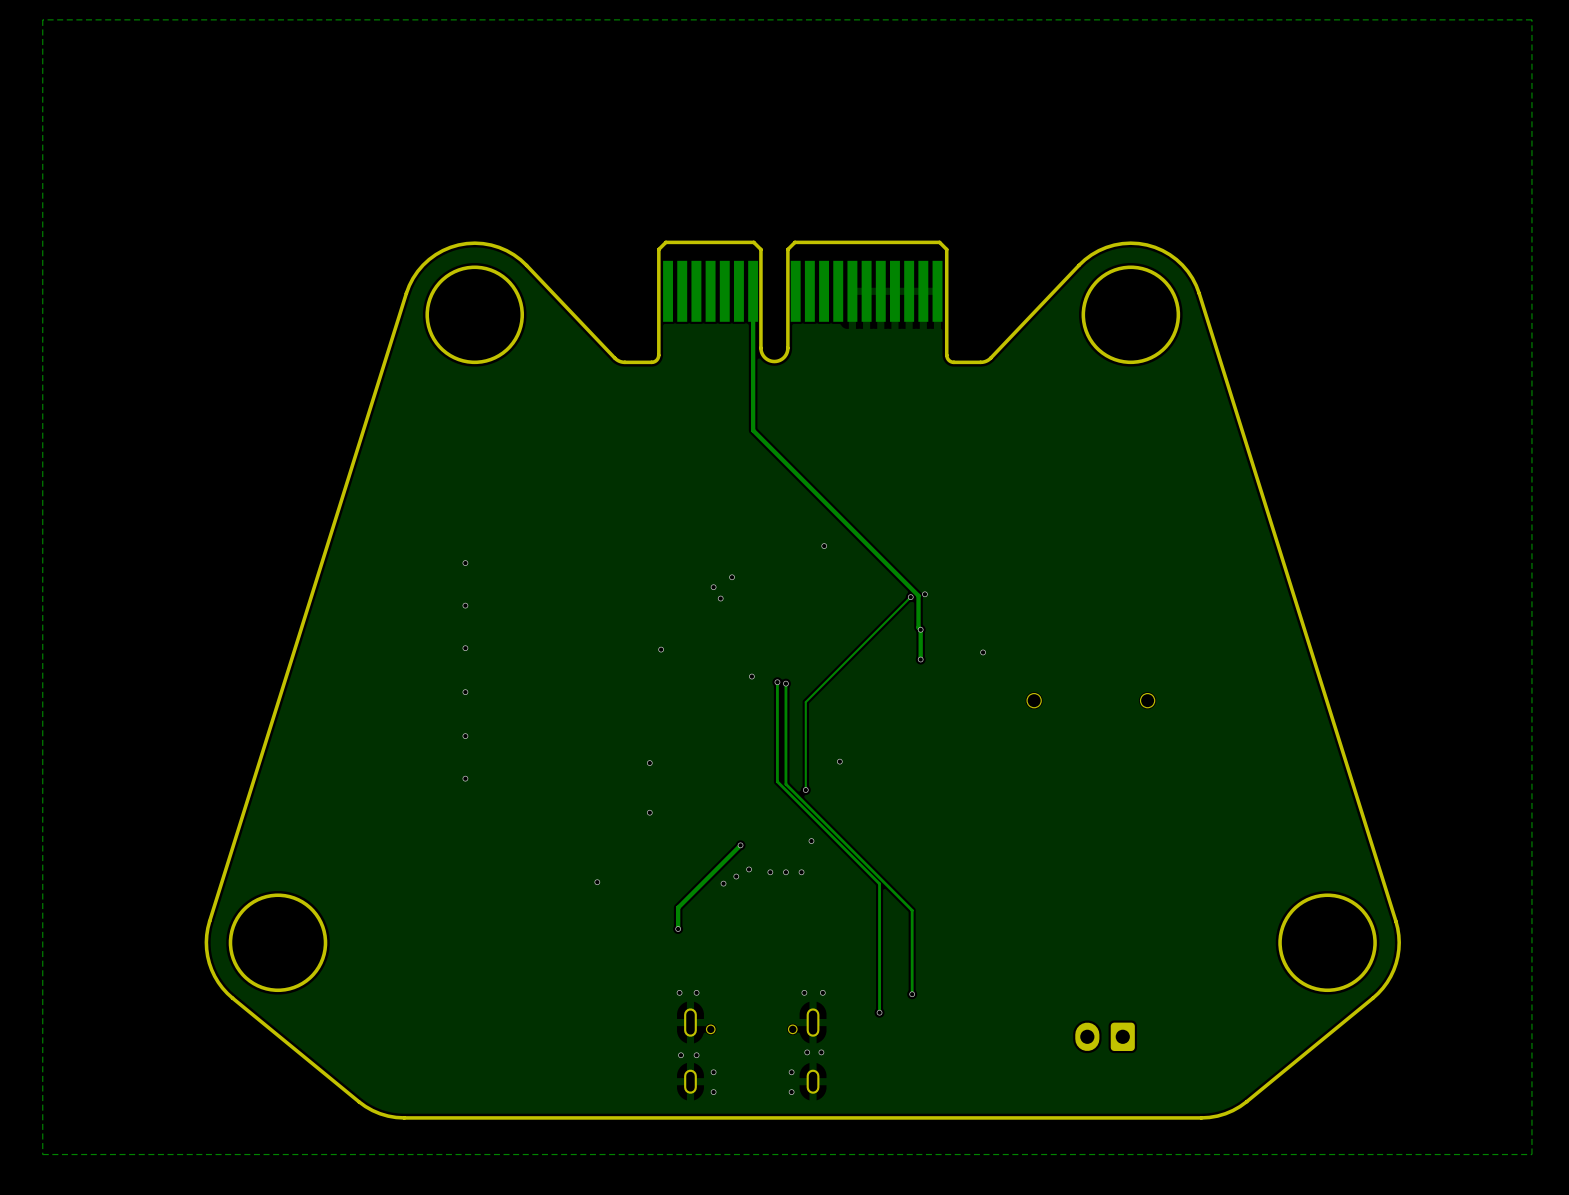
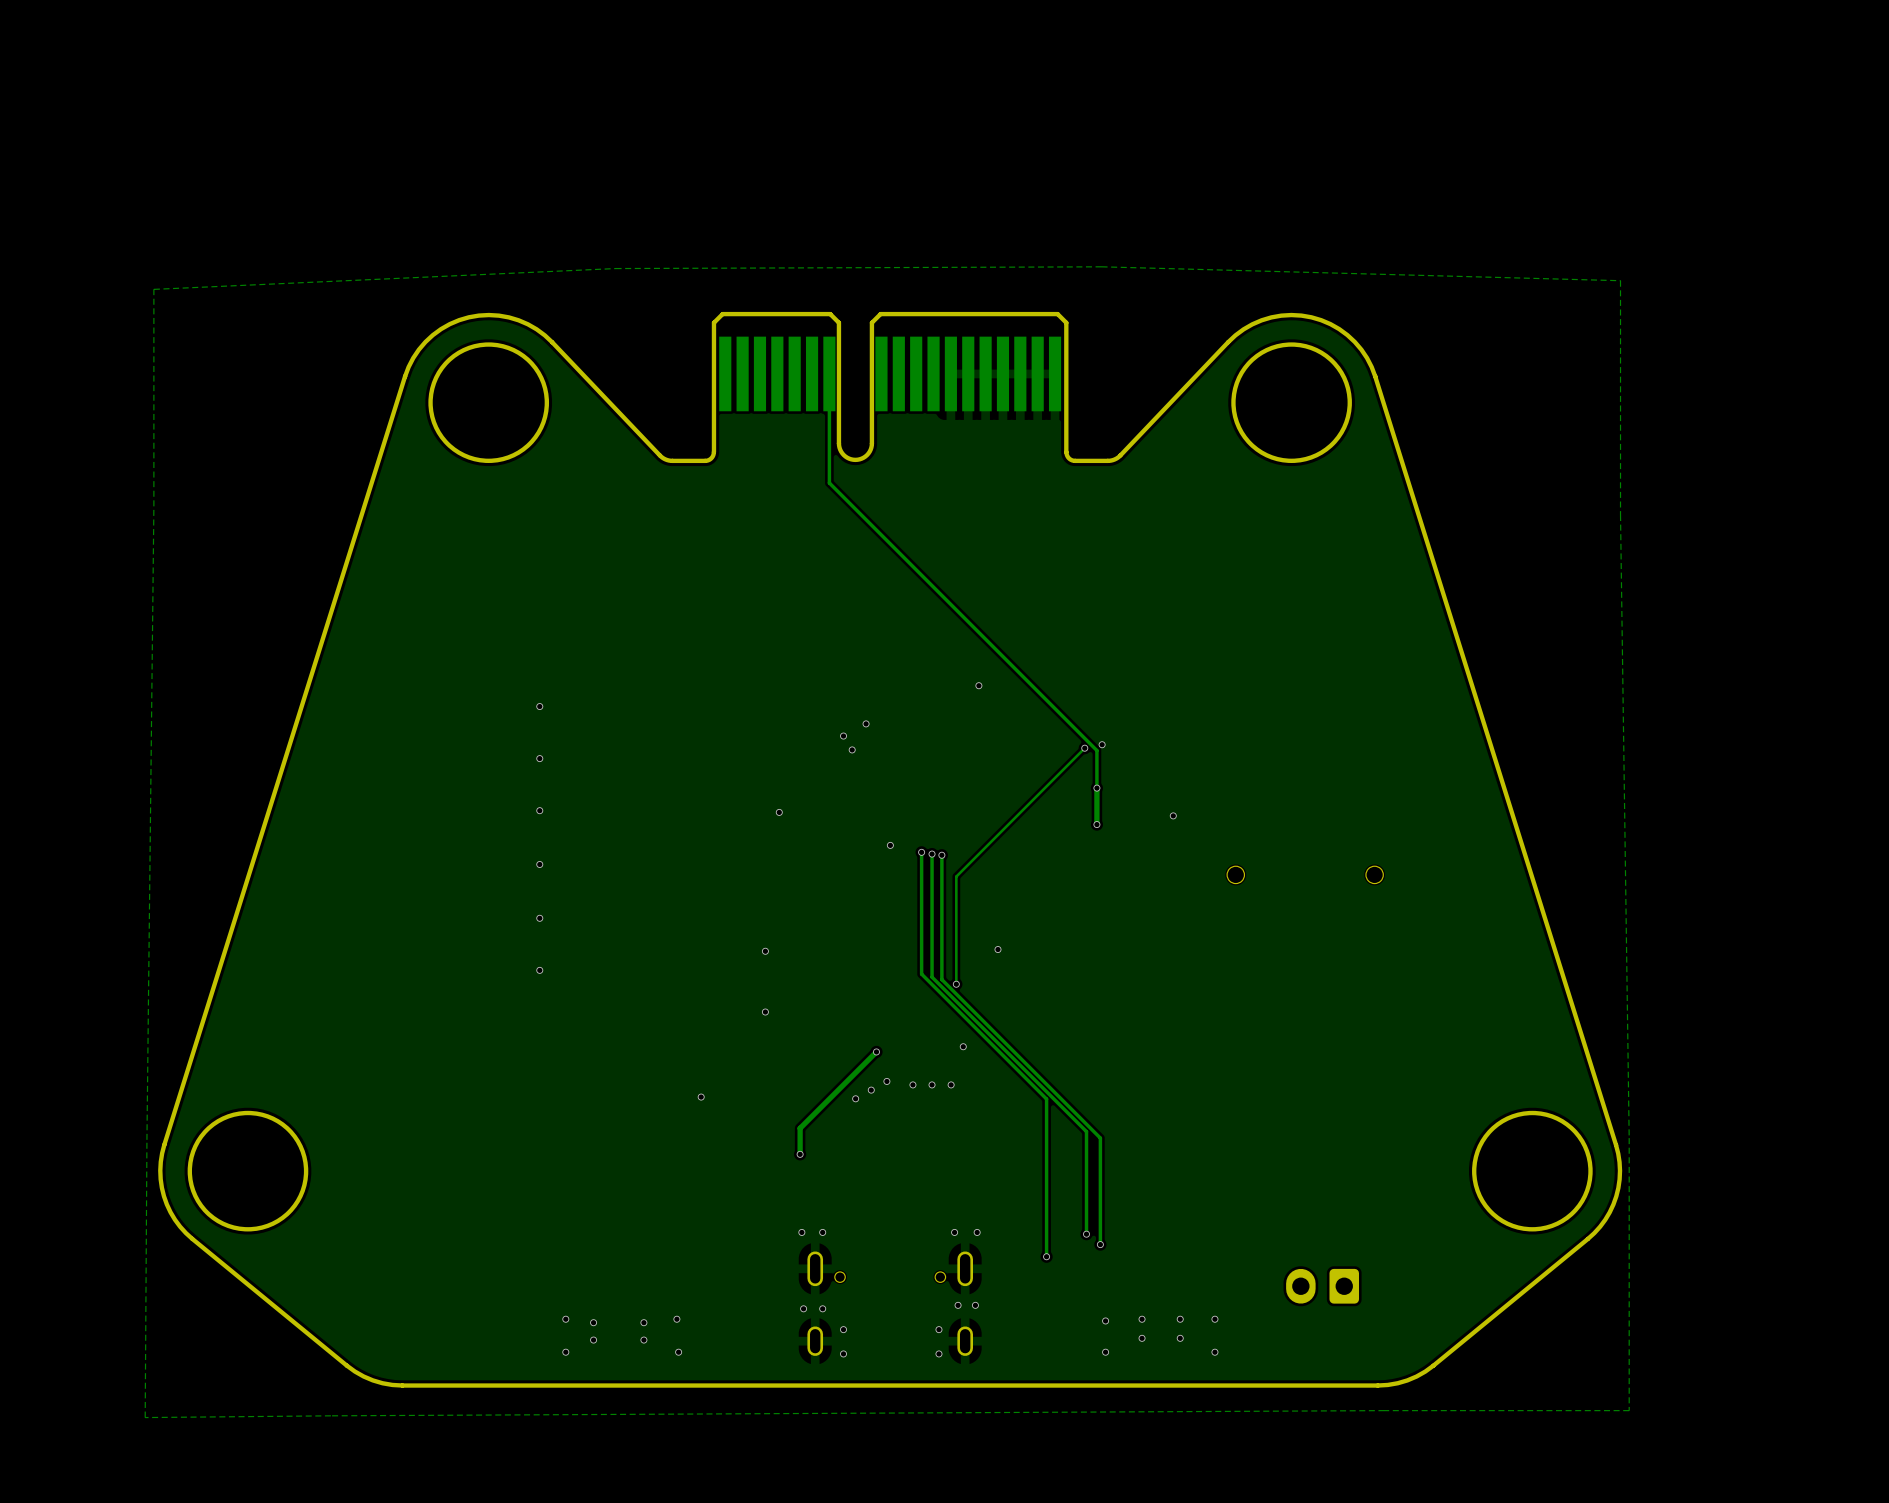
zone outline: (1531, 19) (1531, 1154) (42, 1154) (42, 19) (1531, 19) -> (1101, 266) (1620, 280) (1620, 515) (1629, 1138) (1629, 1410) (145, 1417) (153, 506) (153, 289) (615, 268) (1101, 266)
part position: (802, 301) -> (890, 386)
round board edge position: (474, 314) -> (488, 402)
round board edge position: (1130, 314) -> (1291, 402)
board edge: (658, 355) (656, 360) (652, 362) (623, 362) (616, 359) (520, 259) (506, 250) (491, 245) (466, 243) (450, 247) (435, 254) (417, 271) (406, 293) (209, 921) (206, 942) (209, 963) (214, 976) (232, 998) (365, 1106) (387, 1116) (404, 1117) -> (713, 452) (712, 457) (706, 460) (670, 460) (662, 457) (552, 342) (536, 329) (518, 320) (488, 315) (459, 320) (441, 329) (418, 349) (405, 376) (164, 1144) (160, 1161) (161, 1187) (170, 1212) (180, 1226) (192, 1238) (346, 1365) (372, 1380) (392, 1384) (464, 1385)
board edge: (946, 355) (948, 359) (953, 362) (982, 362) (988, 359) (1078, 265) (1091, 254) (1106, 247) (1130, 243) (1154, 247) (1169, 254) (1187, 271) (1199, 293) (1395, 921) (1399, 942) (1397, 956) (1393, 970) (1382, 988) (1246, 1101) (1232, 1110) (1209, 1117) (1150, 1117) -> (1066, 452) (1069, 458) (1074, 460) (1109, 460) (1117, 457) (1235, 335) (1252, 324) (1271, 317) (1291, 315) (1311, 317) (1339, 329) (1361, 349) (1375, 376) (1616, 1145) (1620, 1170) (1618, 1187) (1613, 1204) (1600, 1226) (1587, 1238) (1425, 1371) (1407, 1380) (1377, 1385)
track: (753, 380) (753, 291) (753, 430) (918, 595) (918, 627) (920, 629) -> (829, 373) (829, 483) (1096, 750) (1096, 788)
track: none -> (941, 855) (941, 979) (1100, 1138) (1100, 1244)
via: none -> (941, 855)
round board edge position: (277, 942) -> (247, 1171)
round board edge position: (1327, 942) -> (1532, 1171)
via: none -> (1100, 1244)
via: none -> (565, 1319)
via: none -> (676, 1319)
via: none -> (1142, 1319)
via: none -> (1180, 1319)
via: none -> (1214, 1319)
via: none -> (1105, 1320)
via: none -> (593, 1322)
via: none -> (643, 1322)
via: none -> (1142, 1338)
via: none -> (1180, 1338)
via: none -> (593, 1340)
via: none -> (643, 1340)
via: none -> (565, 1352)
via: none -> (678, 1352)
via: none -> (1105, 1352)
via: none -> (1214, 1352)

